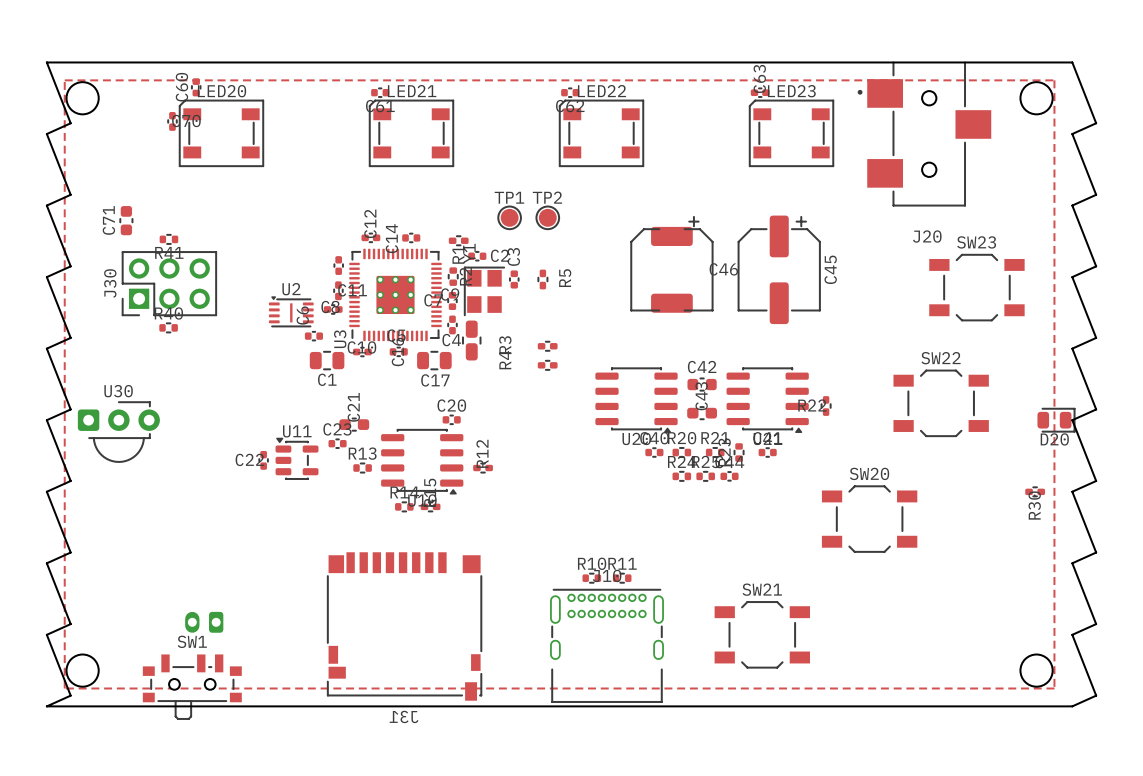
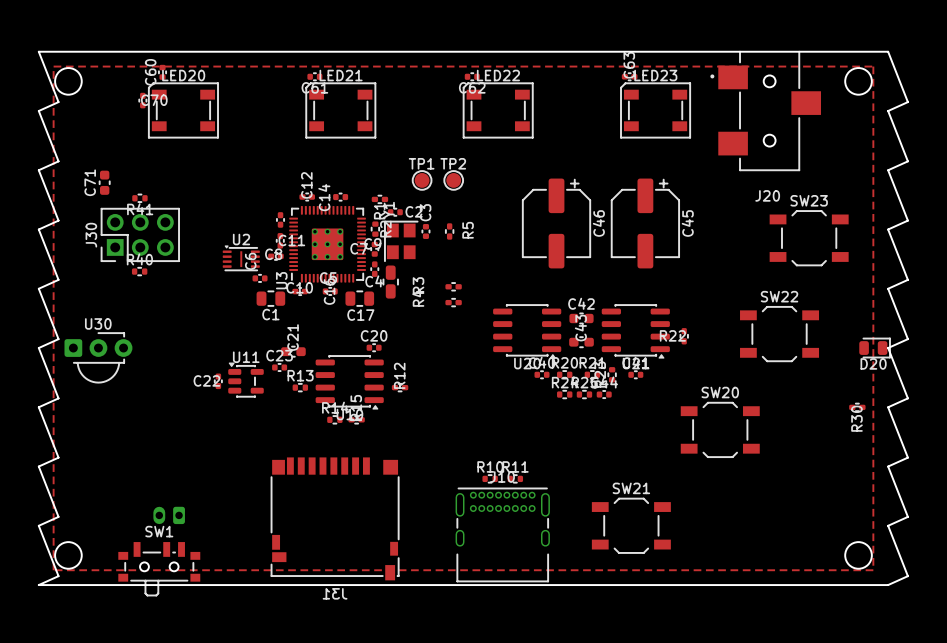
C46 footprint: [630, 216, 714, 313] -> [522, 178, 591, 269]
C46 name rotation: 0° (723, 269) -> 90° counterclockwise (598, 223)

